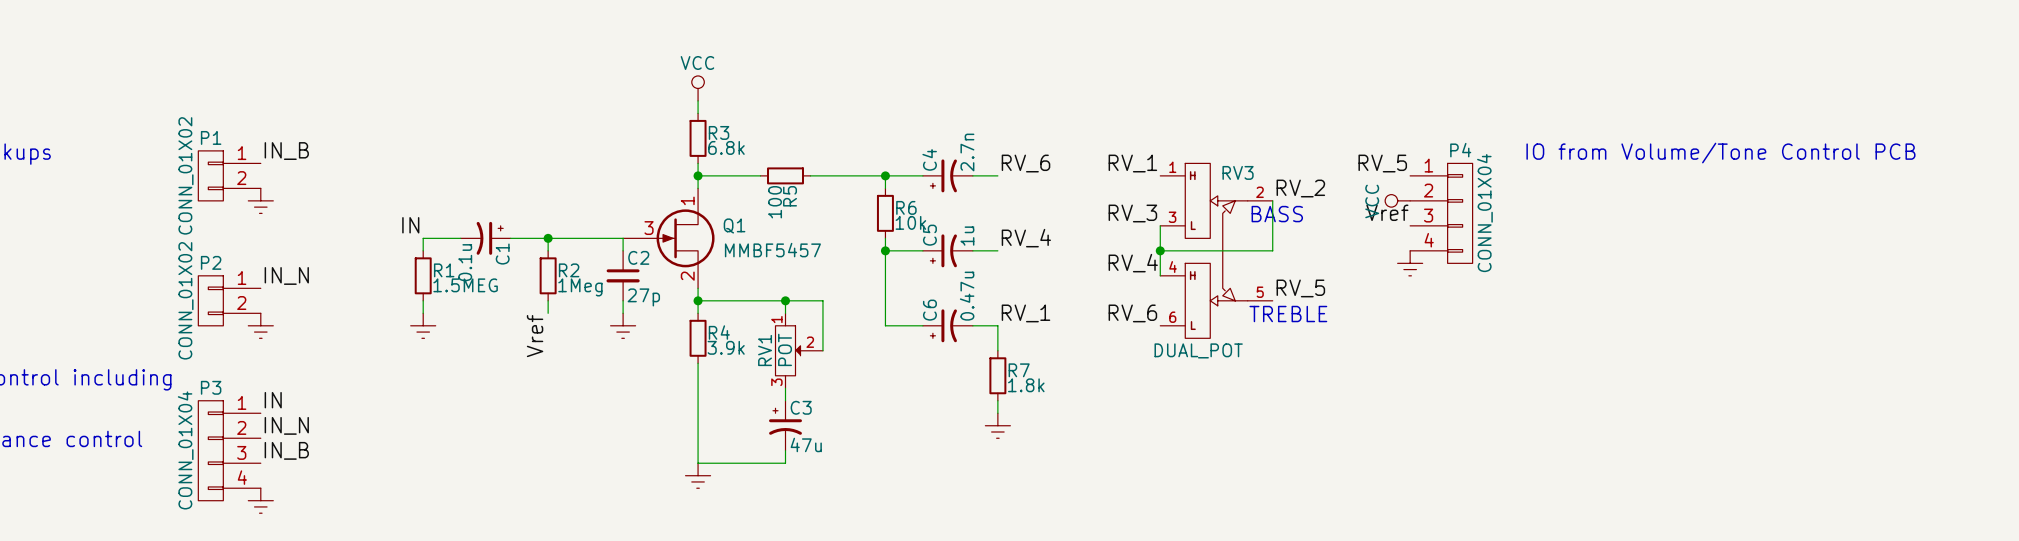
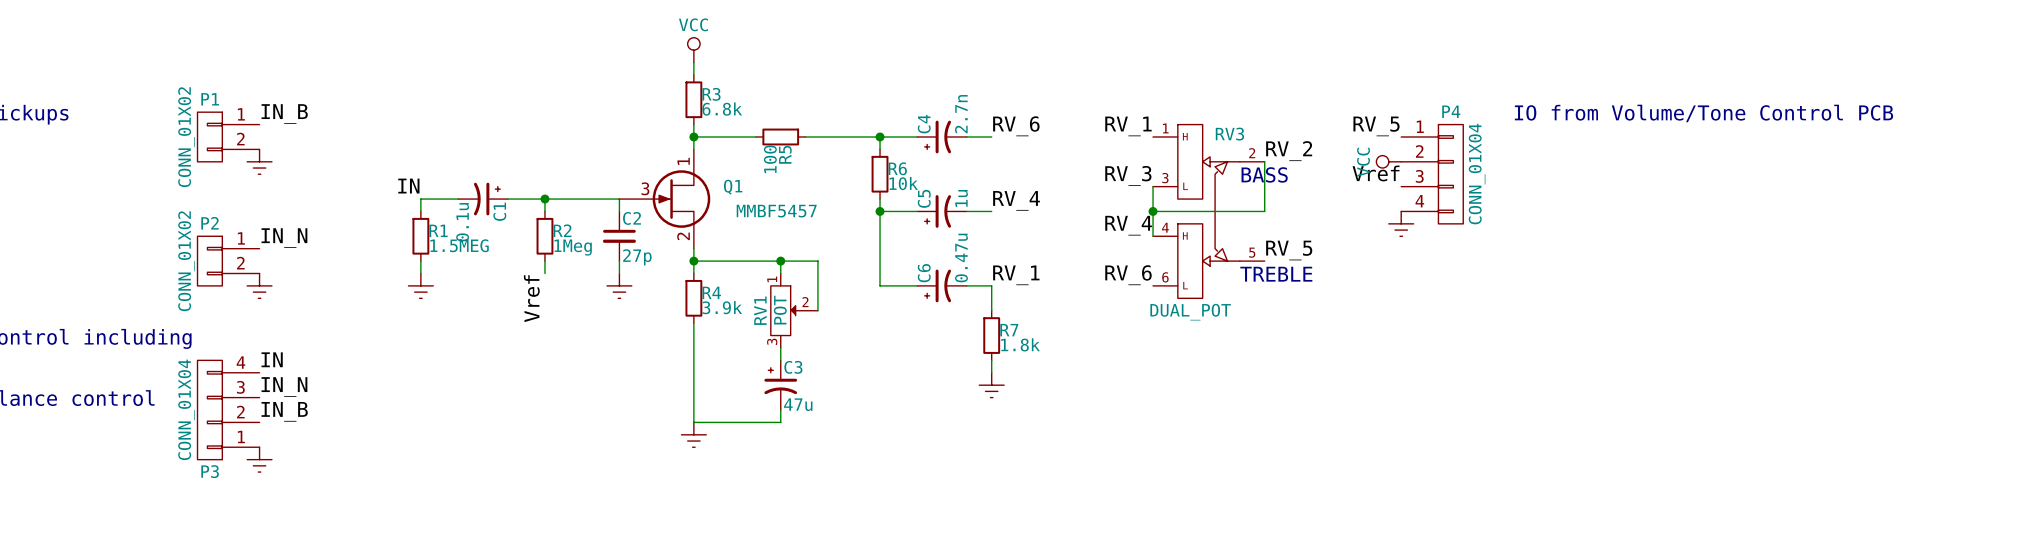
P3 flip: as is (210, 450) -> up-down (209, 410)

